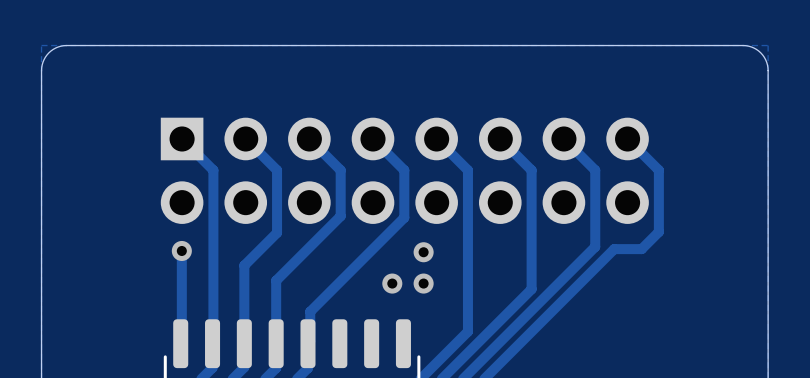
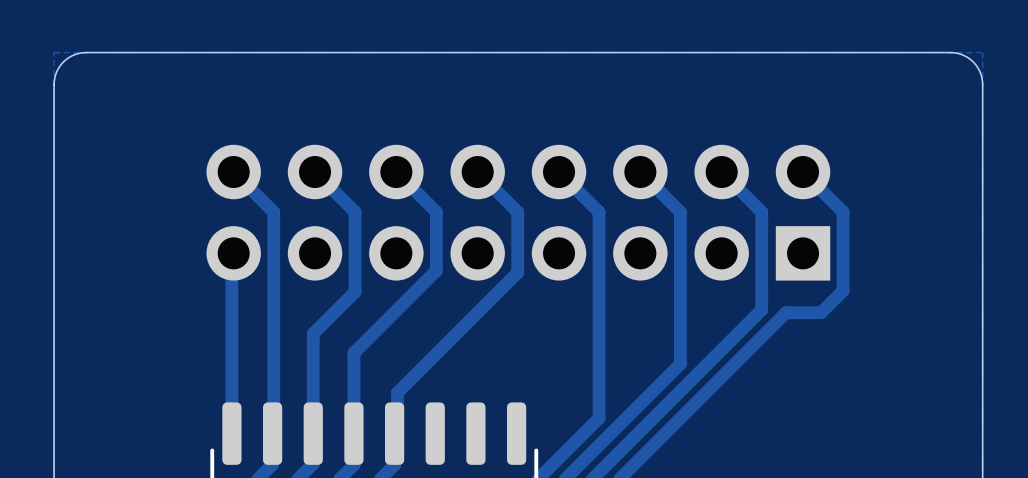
part rotation: 0° (404, 170) -> 180° (518, 212)
track: (181, 250) (180, 343) -> (231, 255) (231, 433)
via: (181, 250) -> none
via: (423, 252) -> none
via: (392, 283) -> none
via: (423, 283) -> none

